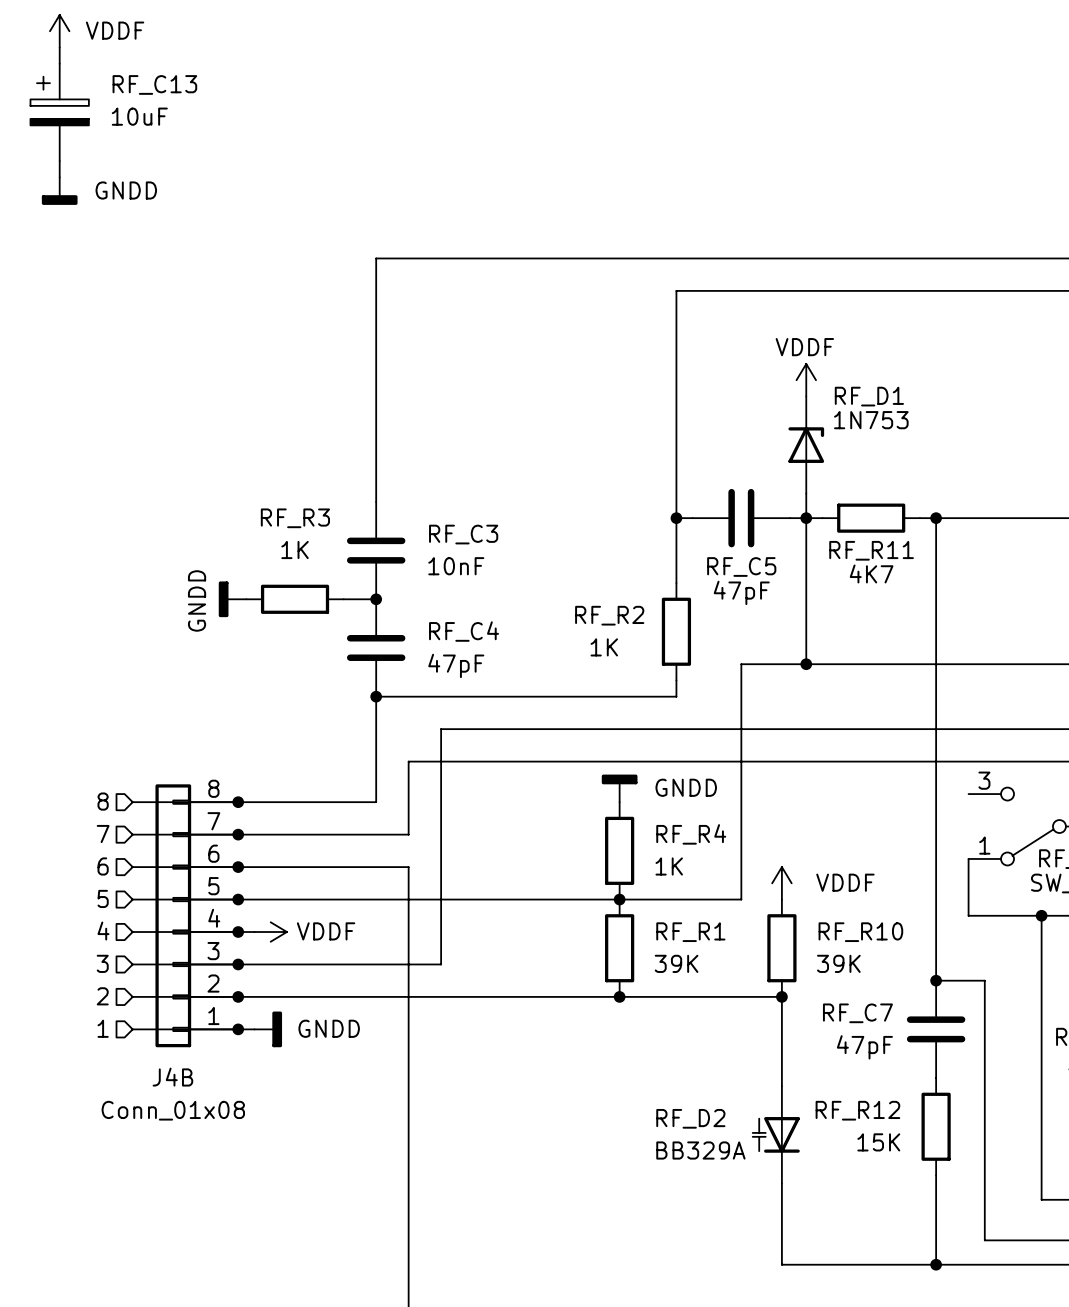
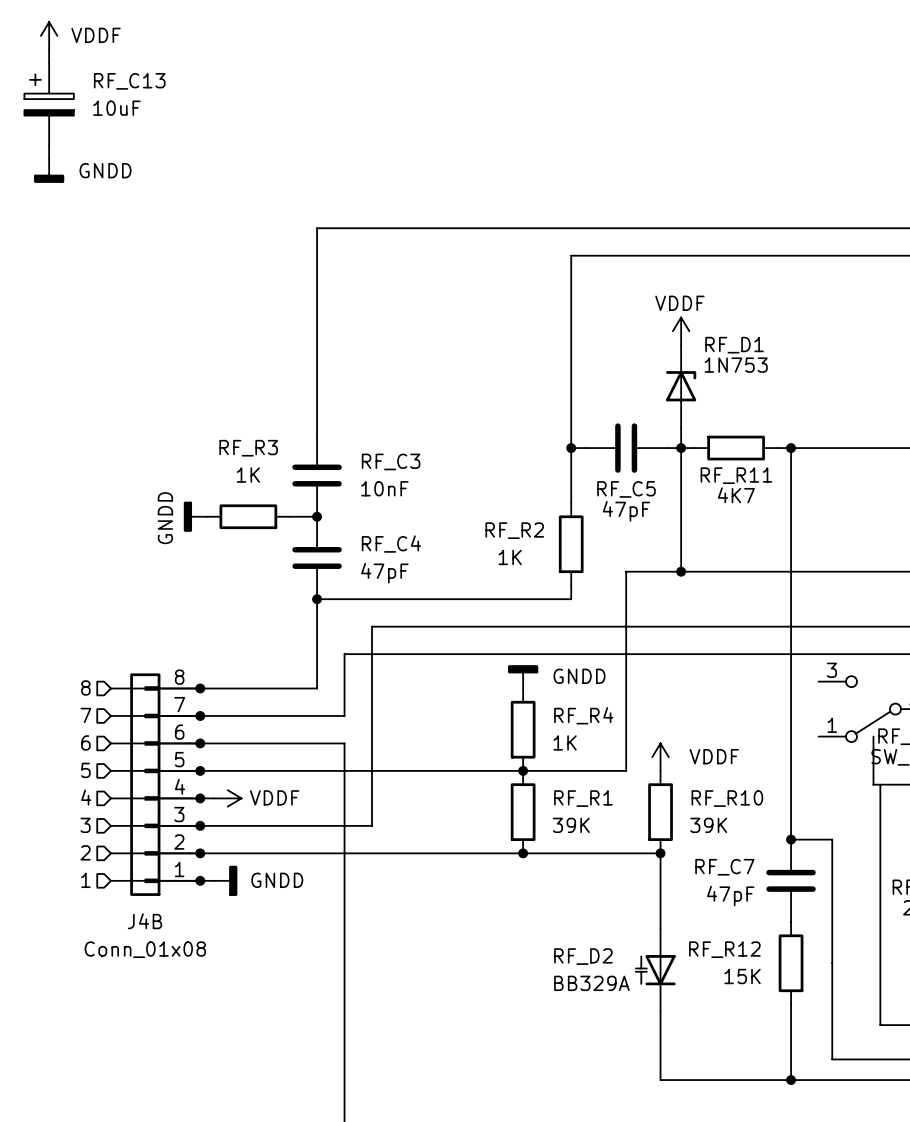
wire: (968, 858) (968, 915) (1033, 915) -> (873, 736) (873, 784)
junction: (1041, 915) -> none

